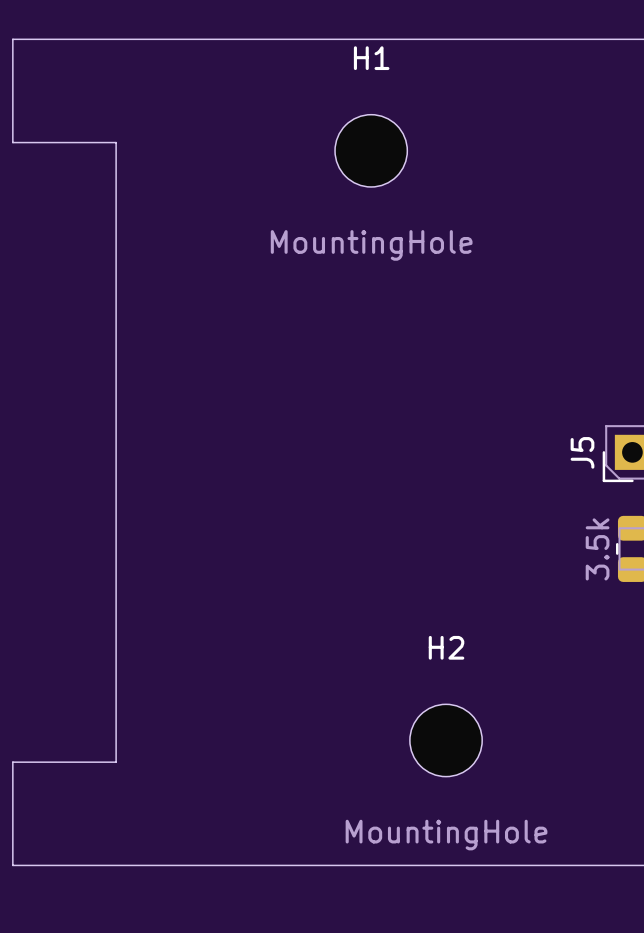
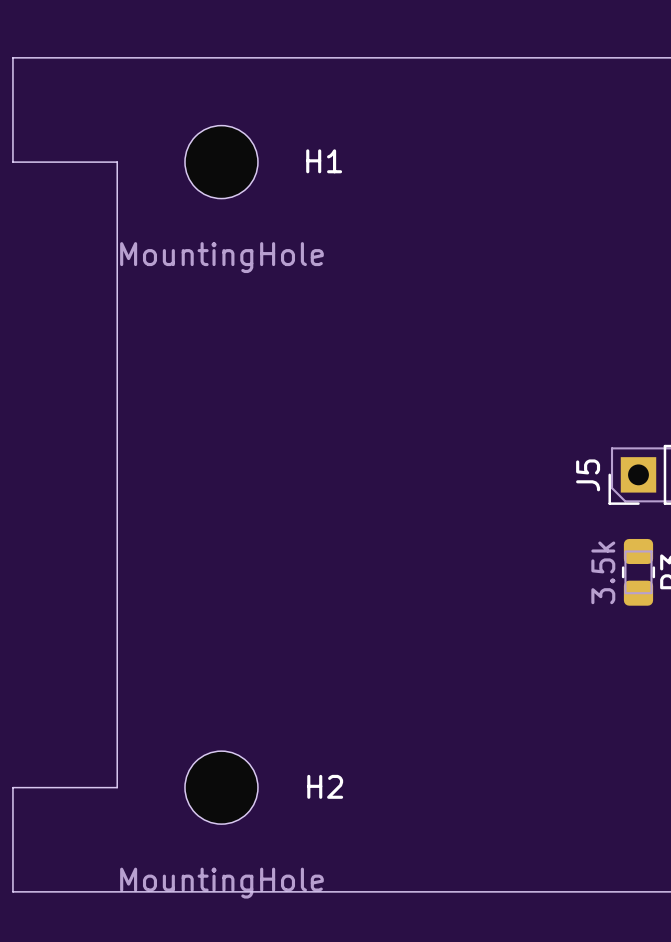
H1 name position: H1 (371, 58) -> H1 (324, 161)
H1 position: (371, 150) -> (221, 162)
H2 name position: H2 (446, 647) -> H2 (325, 786)
H2 position: (446, 740) -> (221, 787)

